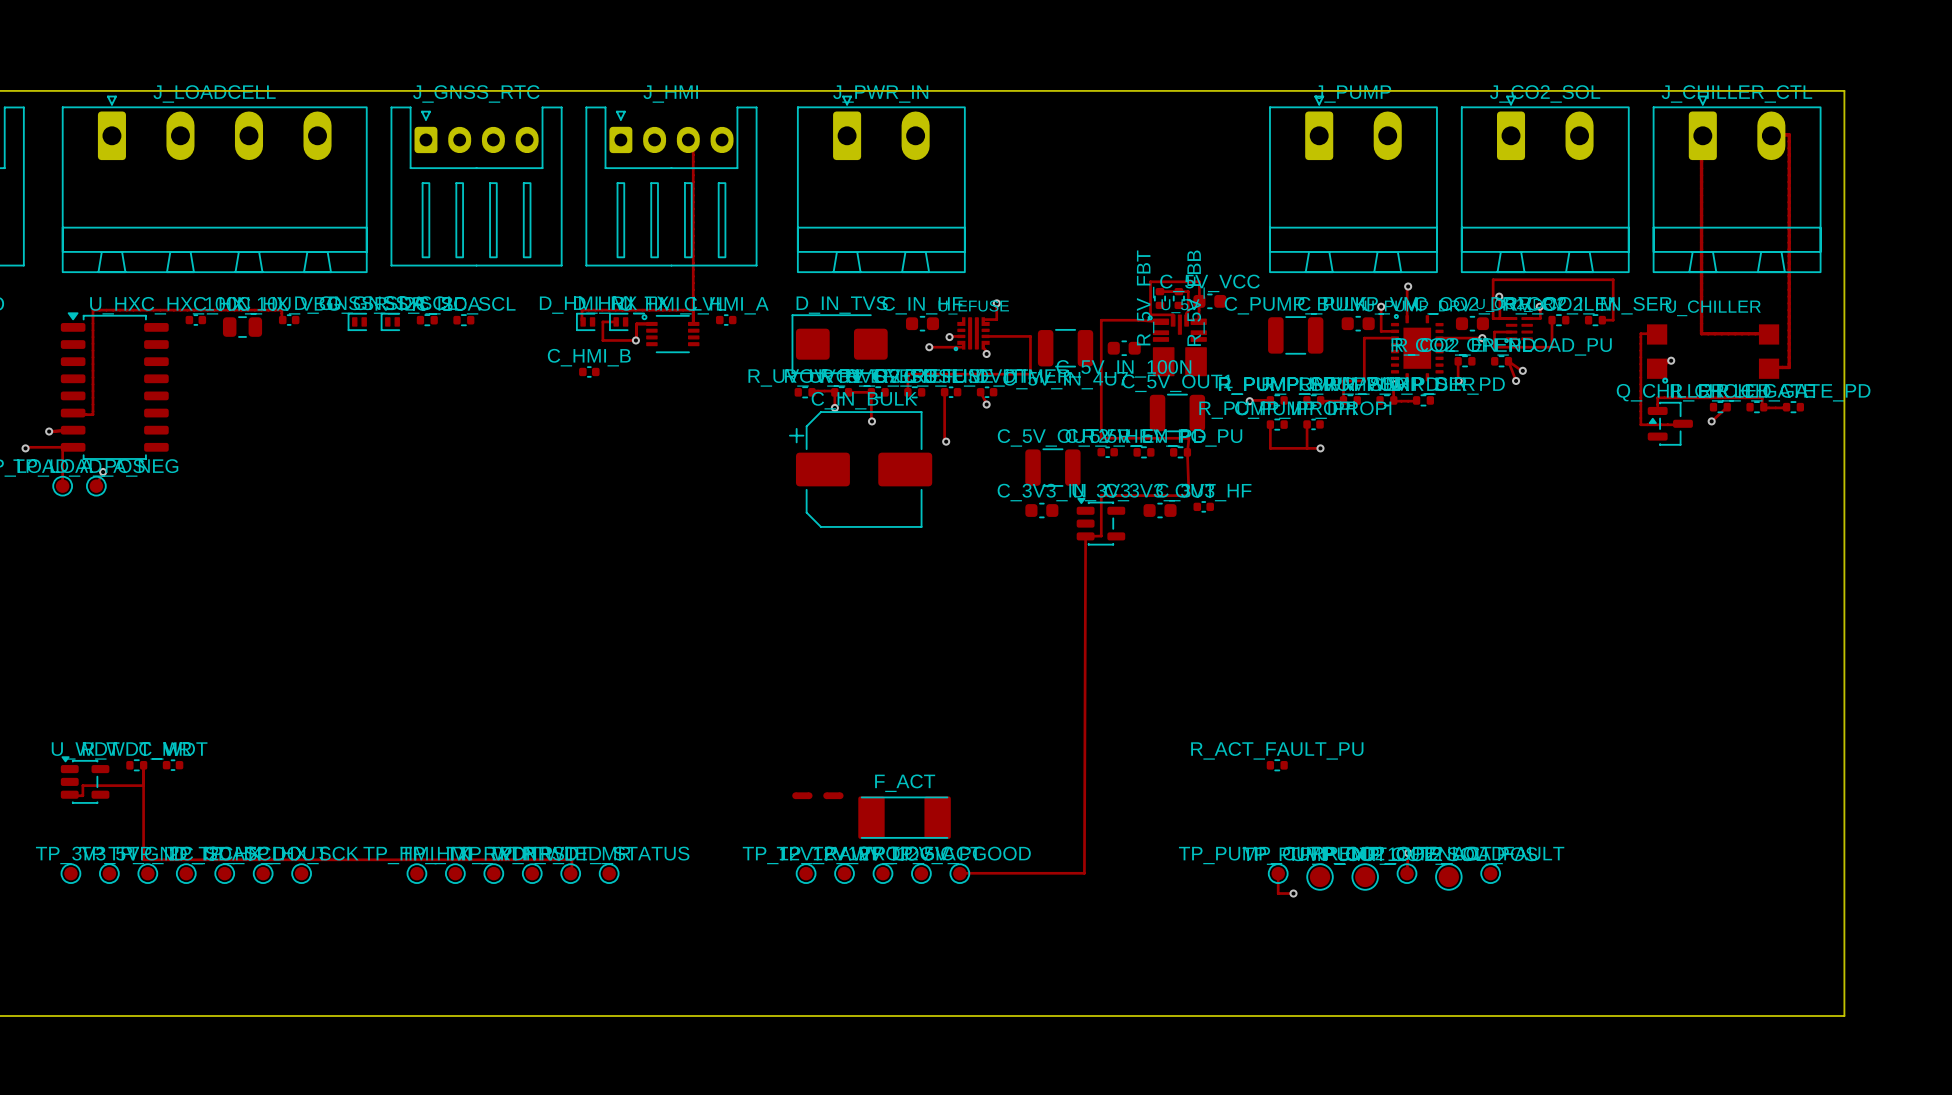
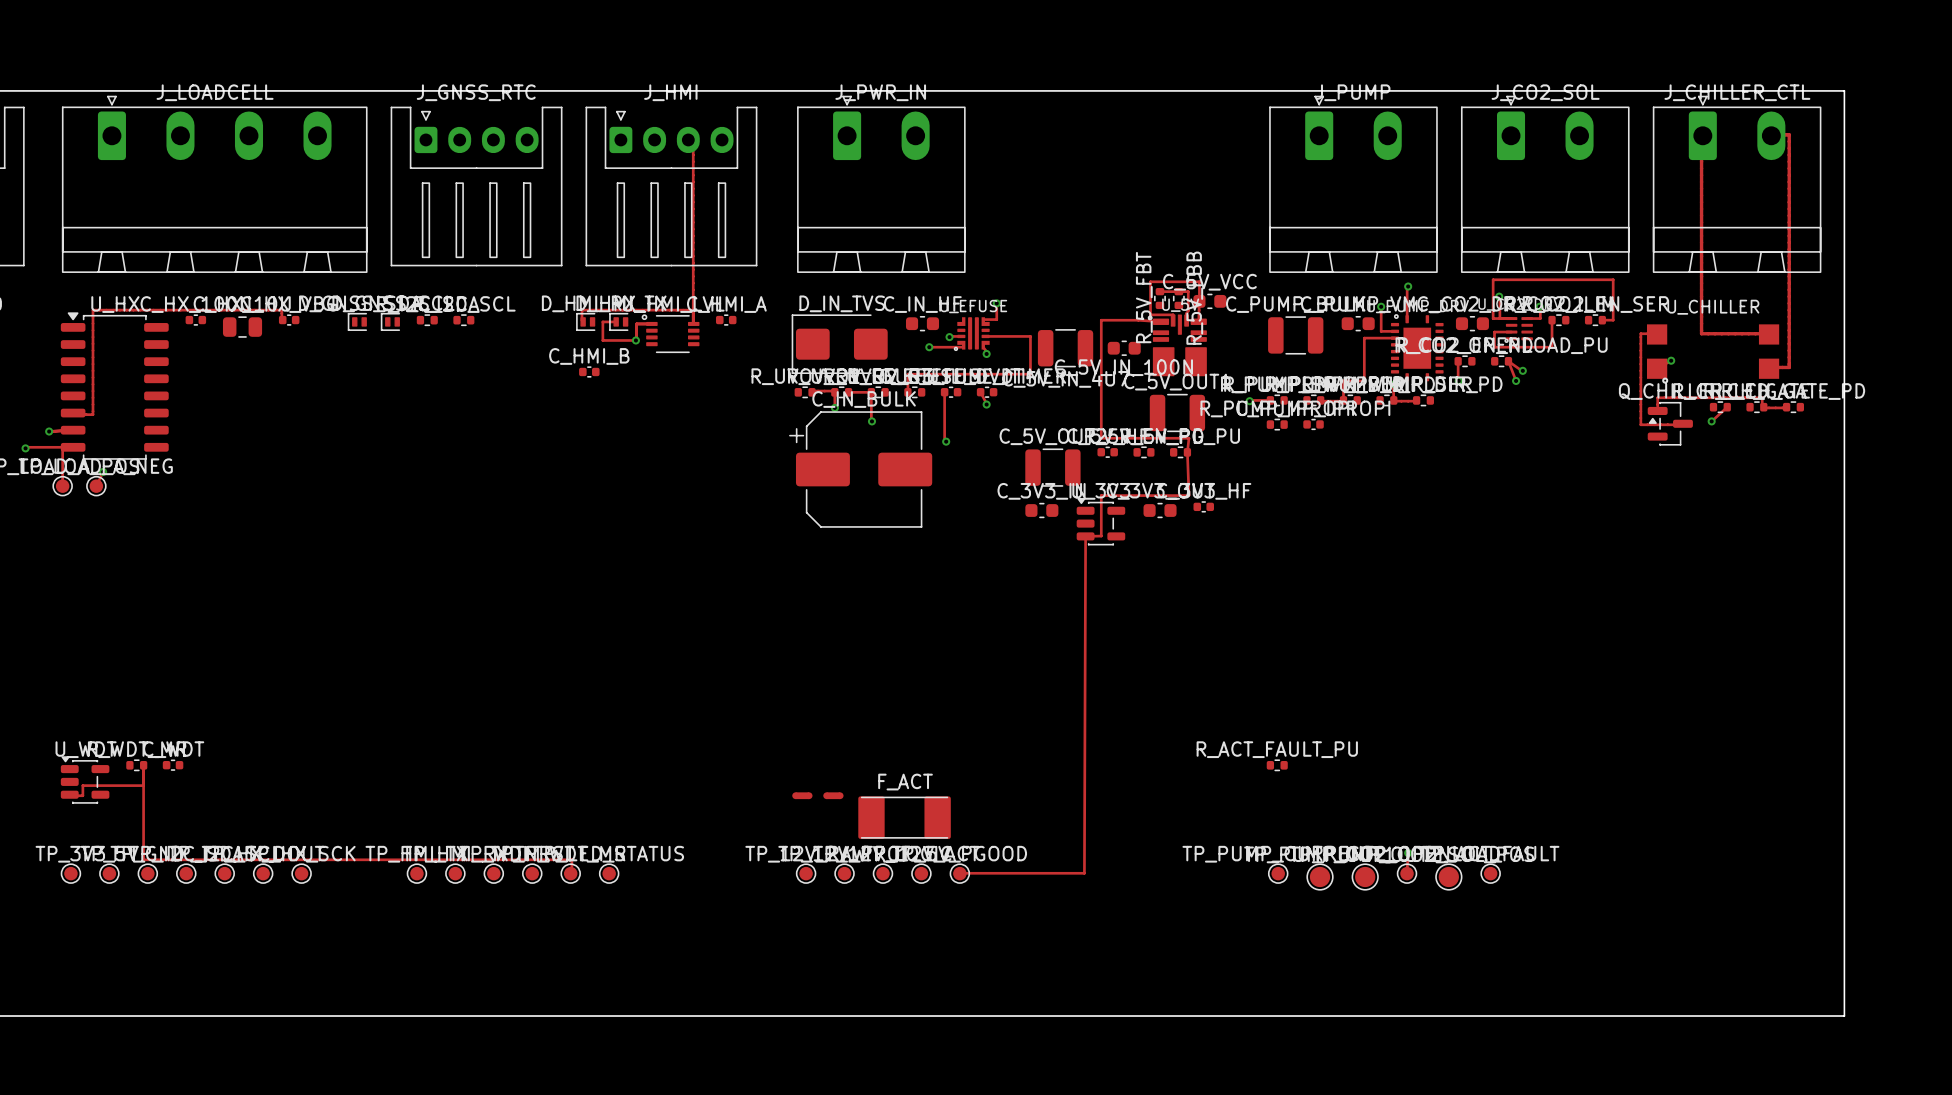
track: (1439, 338) (1482, 338) -> none
via: (1482, 338) -> none
track: (1270, 424) (1270, 448) (1320, 448) -> none
track: (1307, 424) (1307, 448) -> none
via: (1320, 448) -> none
track: (1278, 873) (1278, 893) (1293, 893) -> none
via: (1293, 893) -> none

